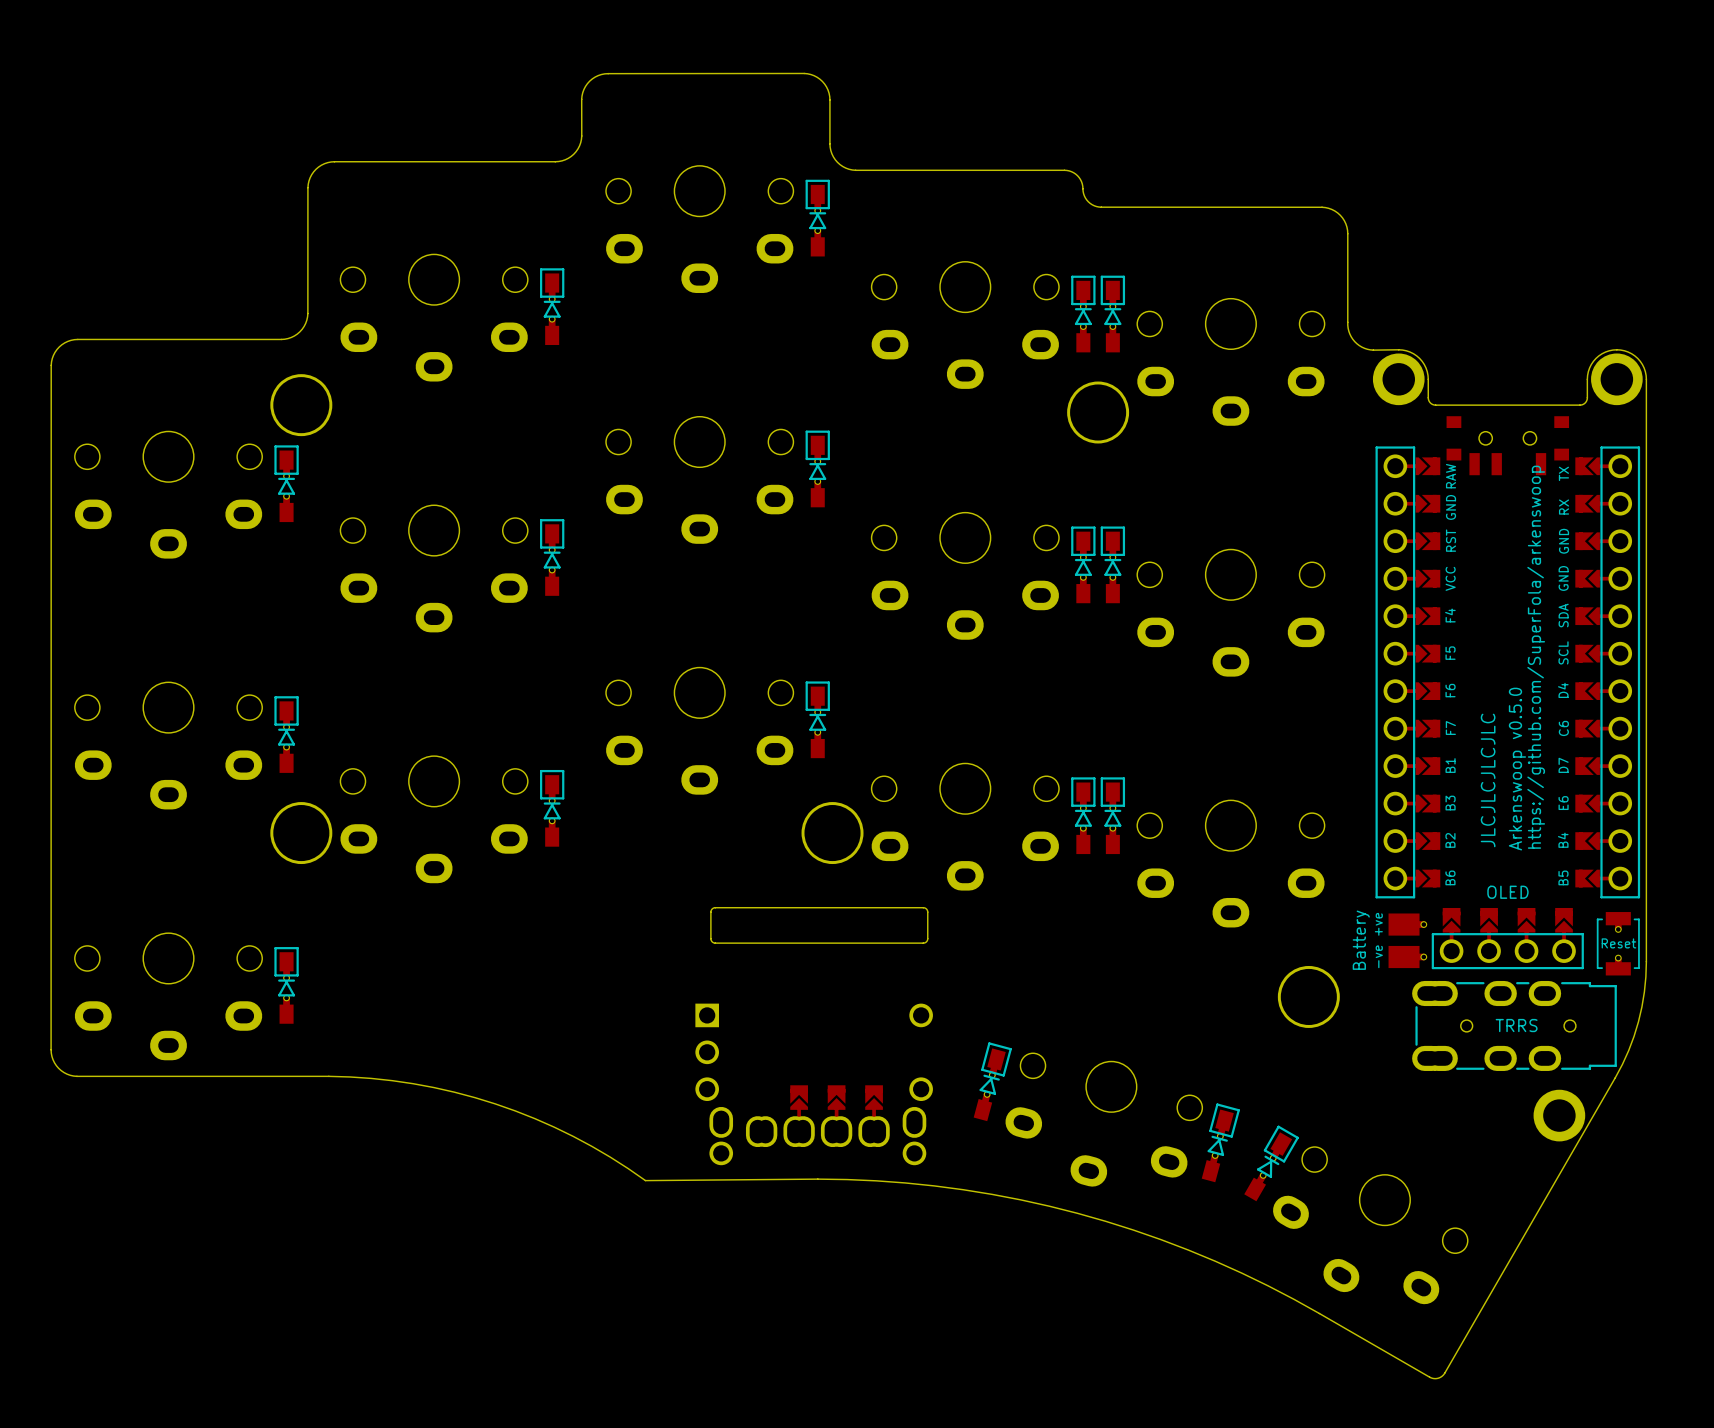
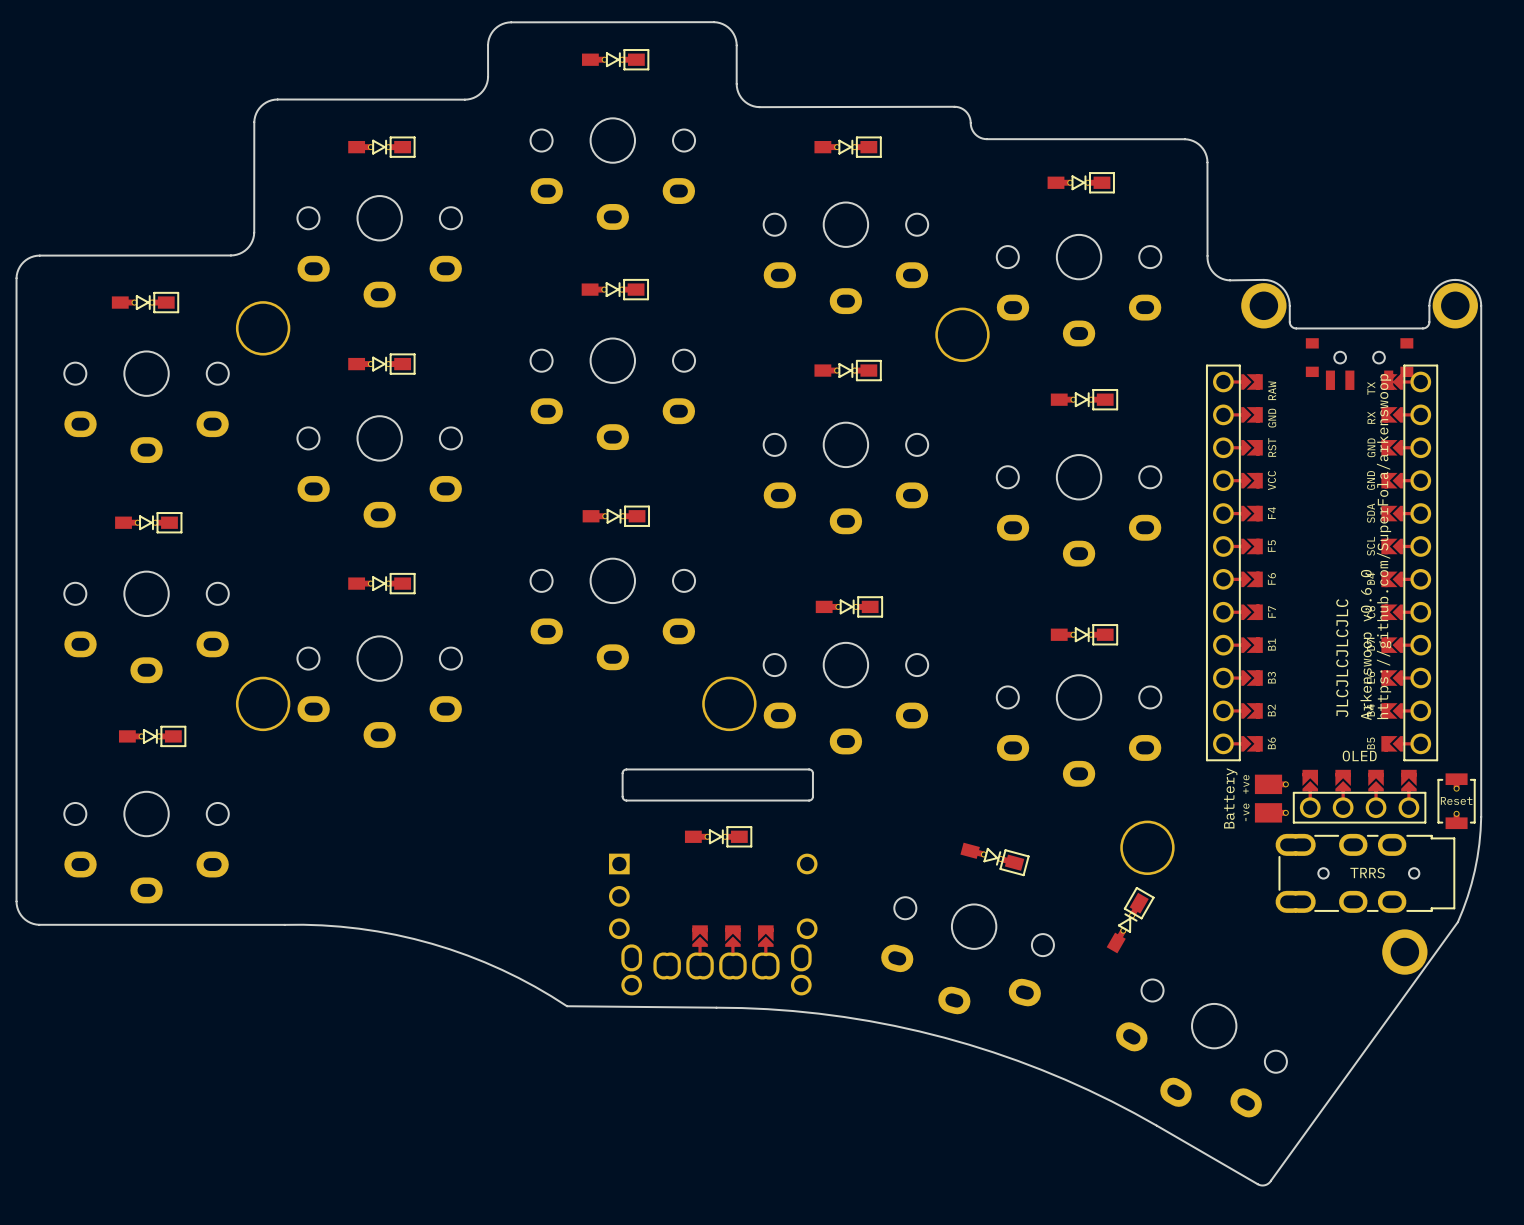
part: none -> (615, 59)
part: none -> (381, 147)
part: none -> (848, 147)
part: (817, 218) -> none
part: none -> (1081, 182)
part: (552, 306) -> none
part: (1083, 314) -> none
part: (1112, 314) -> none
part: none -> (615, 289)
part: none -> (145, 302)
part position: (1398, 379) -> (1263, 305)
part position: (1616, 379) -> (1455, 305)
part: none -> (381, 364)
part position: (1507, 445) -> (1359, 364)
part: none -> (848, 370)
part: (817, 468) -> none
part: (286, 483) -> none
part: none -> (1084, 399)
part: (552, 557) -> none
part: (1083, 564) -> none
part: (1112, 564) -> none
part: none -> (616, 516)
part: none -> (148, 522)
text position: https://github.com/SuperFola/arkenswoop (1536, 657) -> https://github.com/SuperFola/arkenswoop (1384, 546)
part: none -> (381, 583)
part: (817, 719) -> none
part: none -> (849, 606)
part: (286, 734) -> none
part: none -> (1084, 634)
text: Arkenswoop v0.5.0 (1517, 769) -> none
text: none -> Arkenswoop v0.6.0 (1367, 645)
text position: JLCJLCJLCJLC (1488, 780) -> JLCJLCJLCJLC (1342, 658)
part: (552, 808) -> none
part: (1083, 815) -> none
part: (1112, 815) -> none
part: none -> (152, 736)
part position: (1507, 938) -> (1359, 796)
part position: (1407, 940) -> (1271, 798)
part position: (1618, 943) -> (1456, 801)
part: none -> (718, 836)
part: (286, 985) -> none
part: none -> (995, 859)
part position: (1514, 1025) -> (1365, 873)
part: (992, 1081) -> none
part position: (1559, 1115) -> (1404, 952)
part: (1220, 1142) -> none
part position: (1271, 1163) -> (1130, 920)
board edge: (817, 1179) (645, 1180) (592, 1146) (534, 1118) (475, 1097) (413, 1083) (371, 1078) (328, 1076) (76, 1076) (63, 1072) (54, 1062) (51, 1049) (52, 358) (61, 344) (74, 339) (281, 339) (297, 334) (304, 326) (307, 313) (308, 184) (313, 171) (321, 165) (334, 161) (558, 161) (571, 156) (579, 145) (581, 135) (582, 92) (587, 83) (598, 75) (608, 73) (807, 73) (819, 79) (828, 89) (830, 150) (837, 162) (848, 169) (1066, 170) (1079, 177) (1086, 199) (1098, 207) (1322, 207) (1334, 211) (1344, 220) (1347, 230) (1347, 325) (1351, 336) (1356, 343) (1367, 349) (1402, 350) (1416, 355) (1424, 364) (1427, 371) (1428, 399) (1433, 404) (1581, 404) (1587, 399) (1589, 368) (1598, 355) (1609, 350) (1620, 350) (1631, 353) (1640, 361) (1644, 368) (1646, 379) (1646, 961) (1644, 992) (1634, 1036) (1615, 1077) (1443, 1375) (1436, 1378) (1429, 1377) (1319, 1313) -> (716, 1007) (567, 1006) (518, 978) (467, 955) (414, 938) (359, 928) (303, 924) (39, 924) (30, 922) (23, 917) (18, 910) (16, 901) (16, 278) (18, 269) (23, 262) (31, 257) (39, 255) (230, 255) (242, 252) (250, 244) (254, 232) (254, 119) (259, 108) (268, 101) (277, 99) (470, 98) (481, 93) (487, 82) (489, 36) (497, 26) (508, 22) (714, 22) (725, 25) (734, 36) (737, 89) (743, 100) (753, 106) (956, 106) (967, 113) (974, 132) (984, 139) (1184, 139) (1196, 142) (1204, 151) (1207, 159) (1207, 258) (1210, 268) (1215, 274) (1224, 279) (1267, 280) (1279, 285) (1288, 299) (1289, 322) (1293, 327) (1424, 328) (1429, 324) (1430, 300) (1436, 287) (1452, 280) (1462, 280) (1471, 285) (1479, 295) (1481, 305) (1481, 816) (1474, 870) (1463, 909) (1457, 922) (1268, 1183) (1257, 1184) (1156, 1125)

